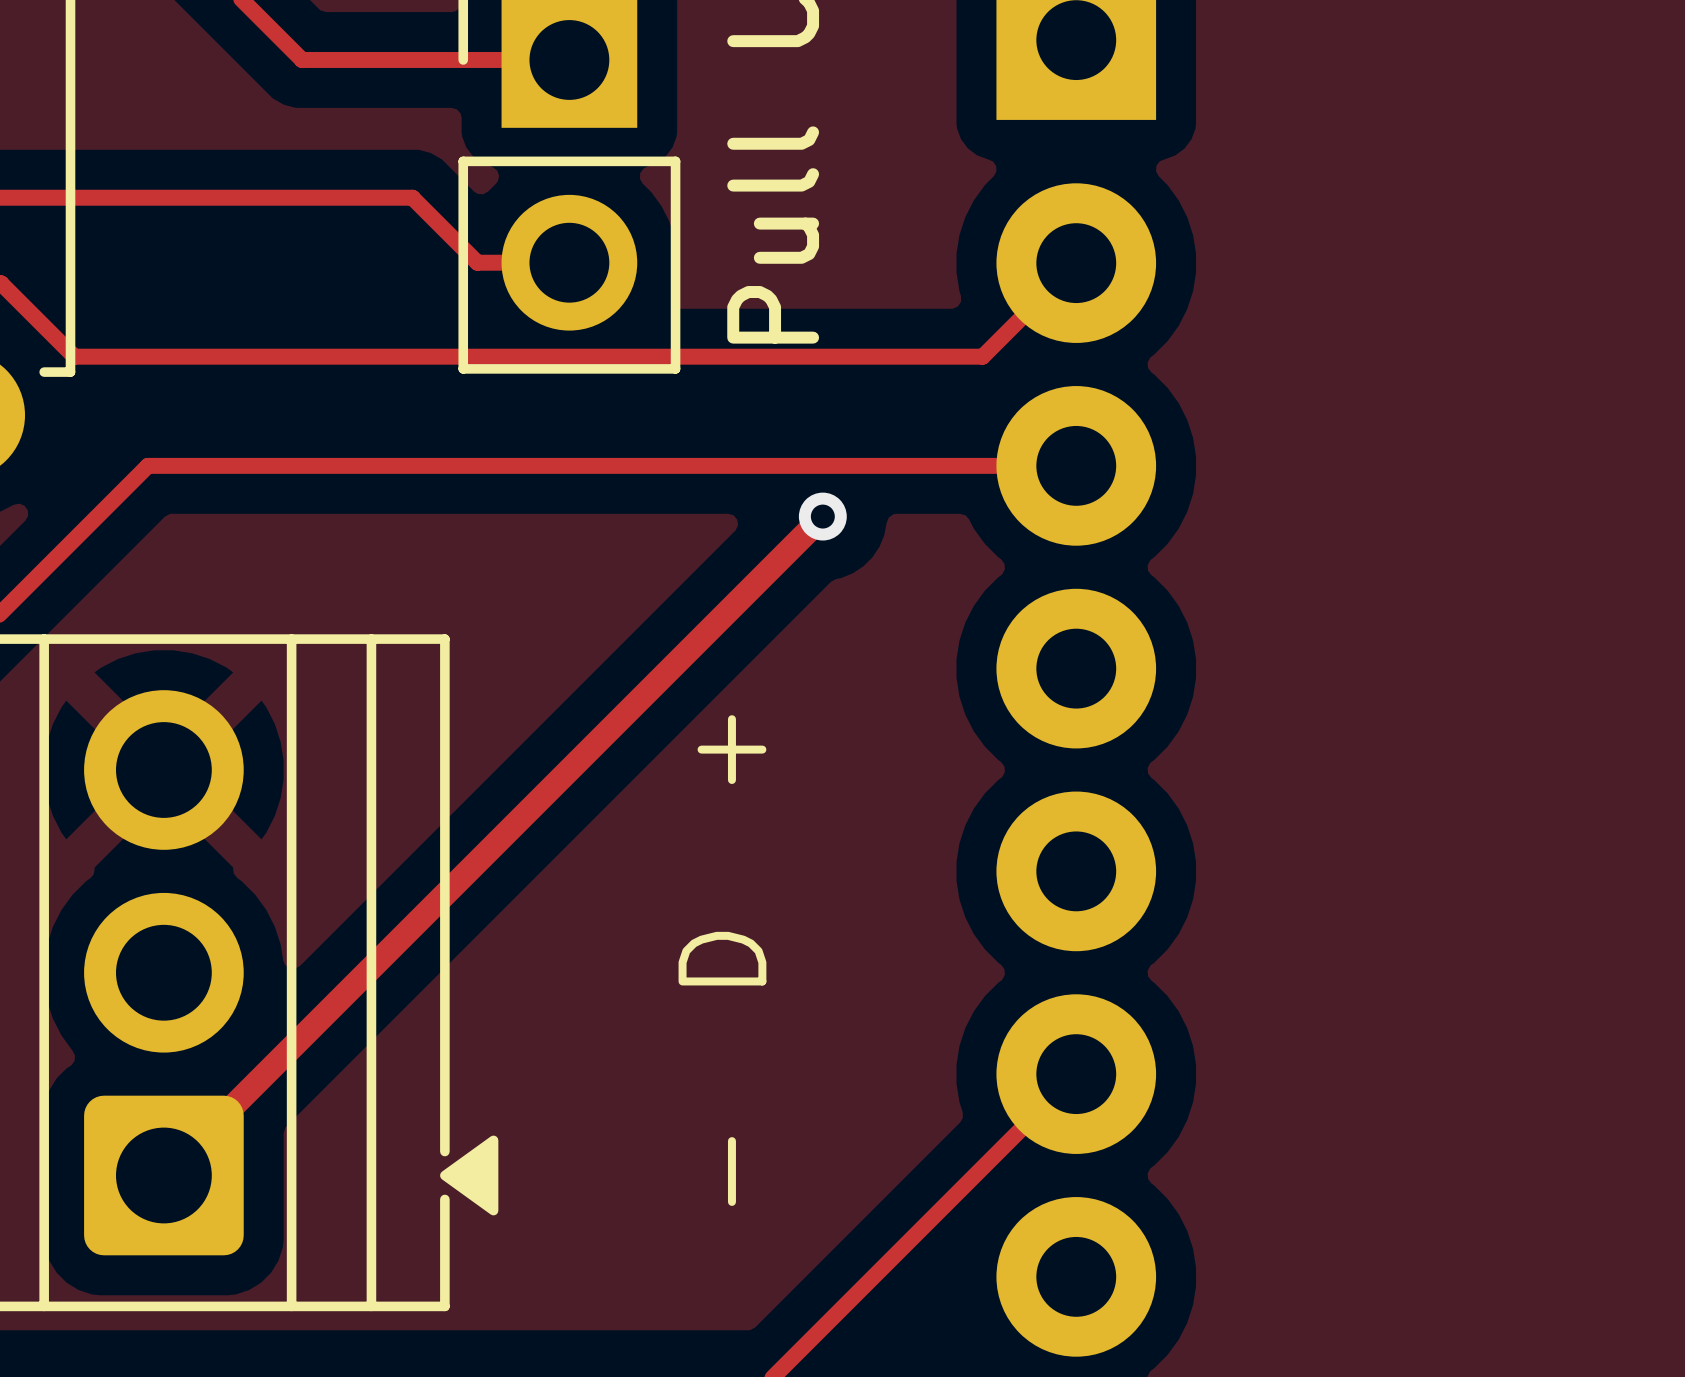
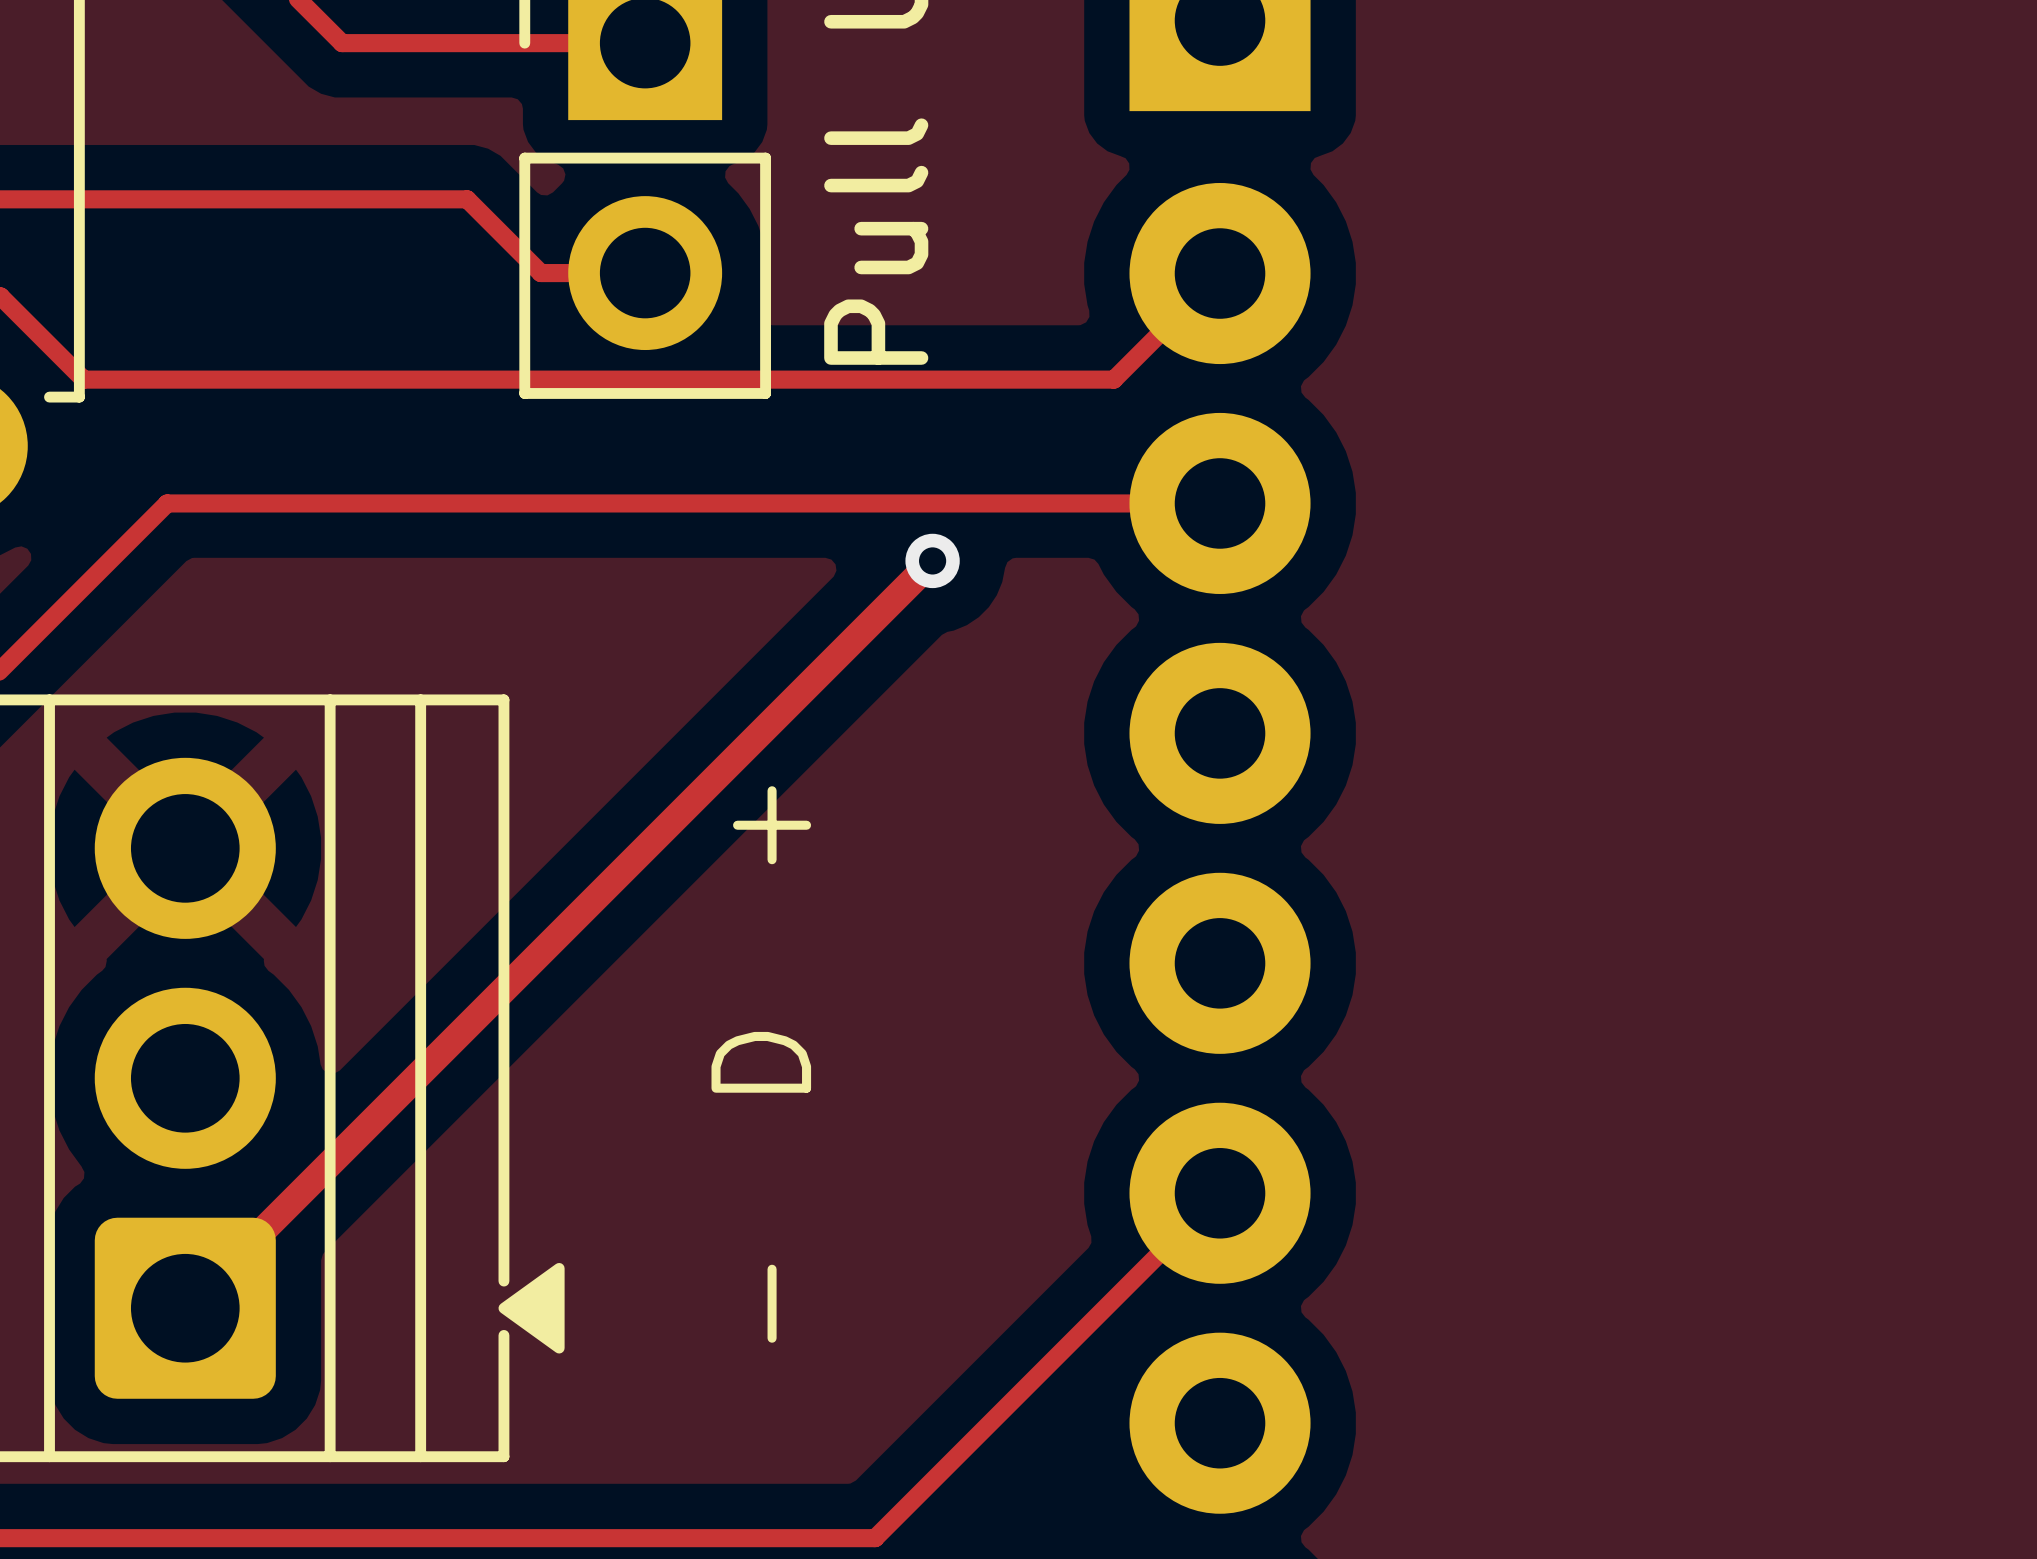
text position: - D + (722, 960) -> - D + (761, 1064)

